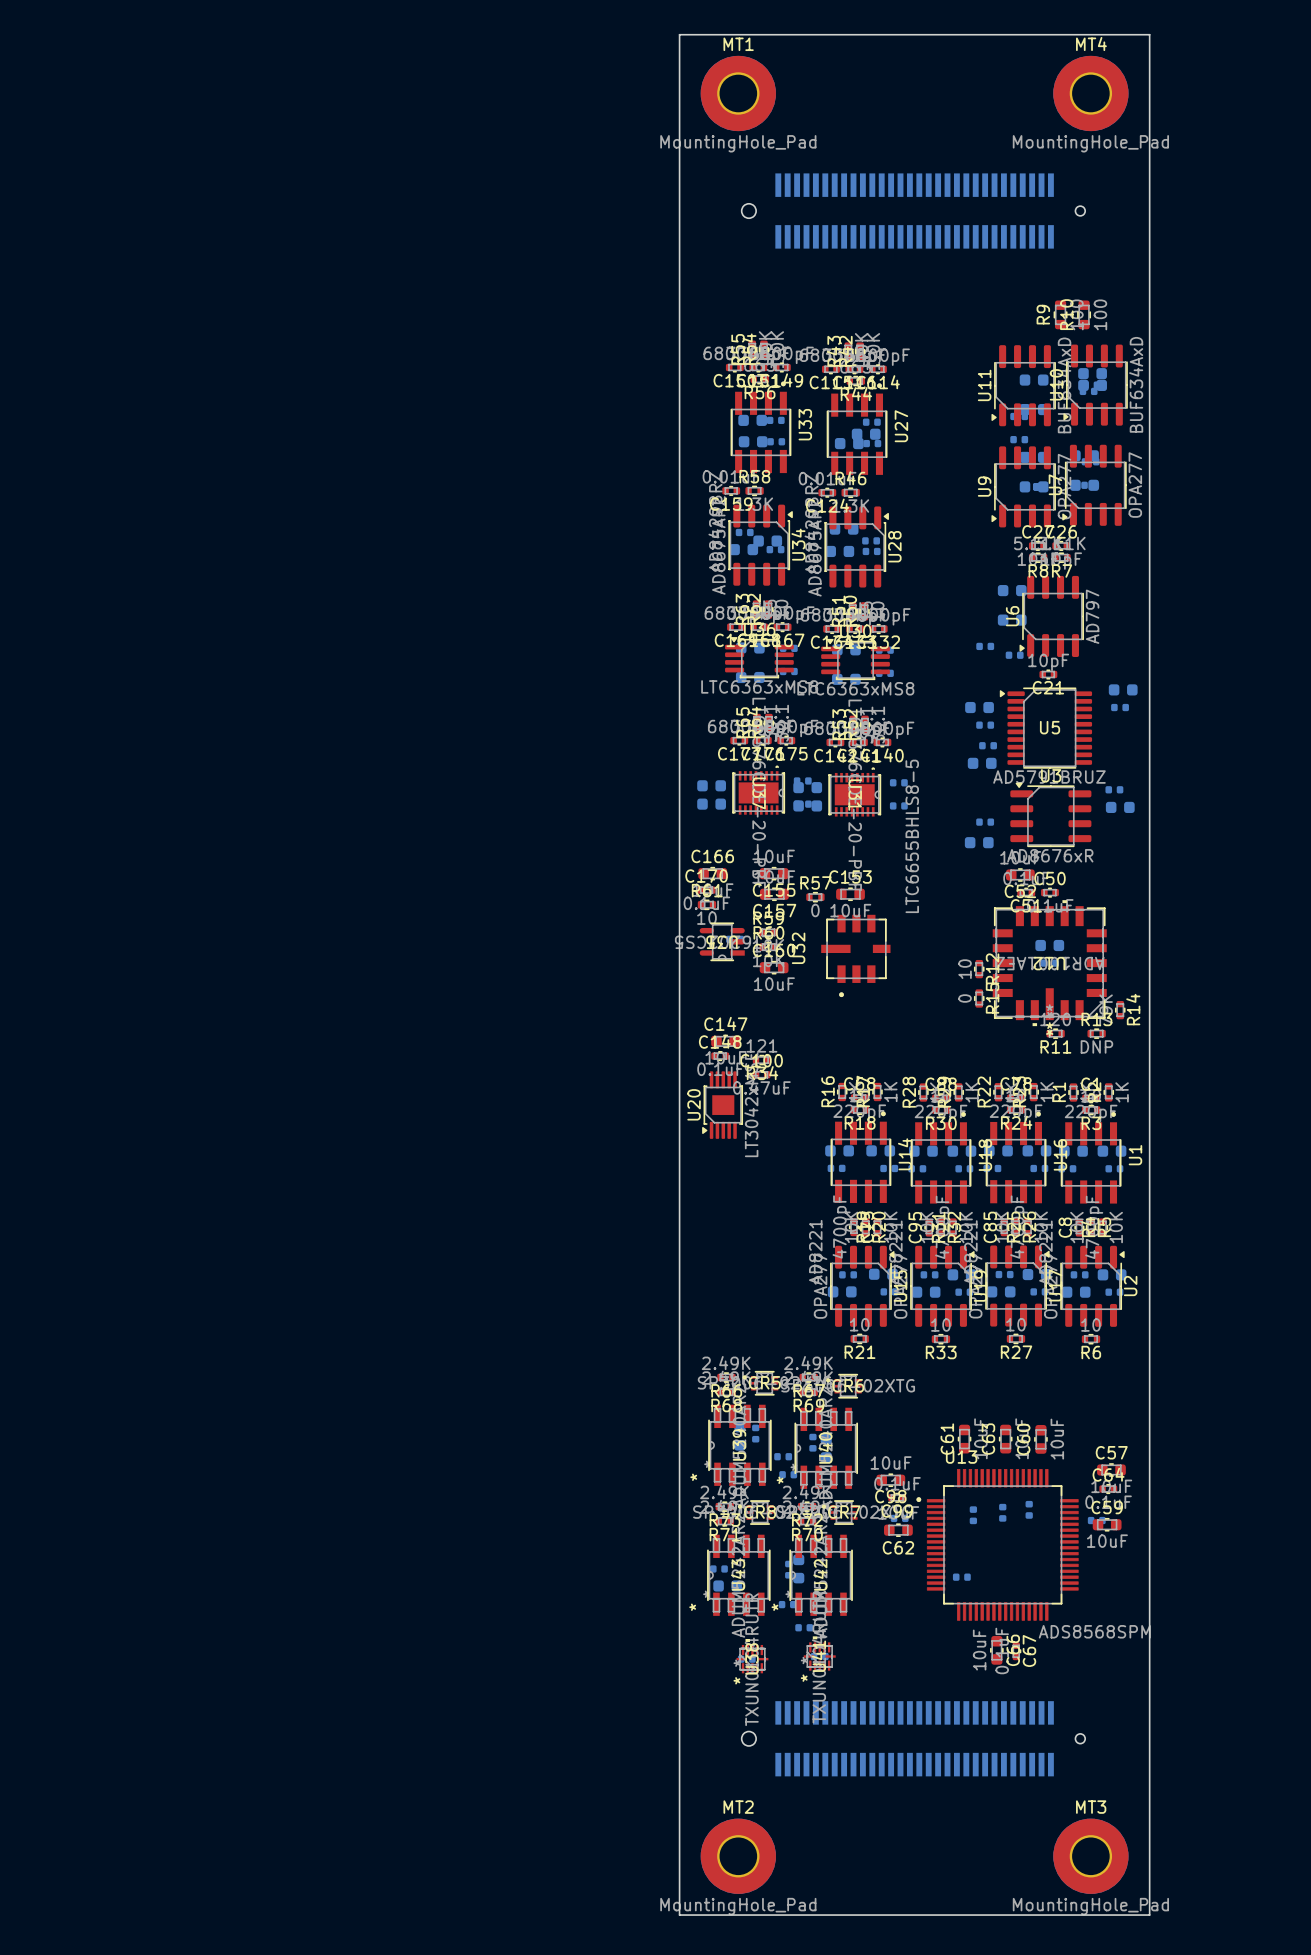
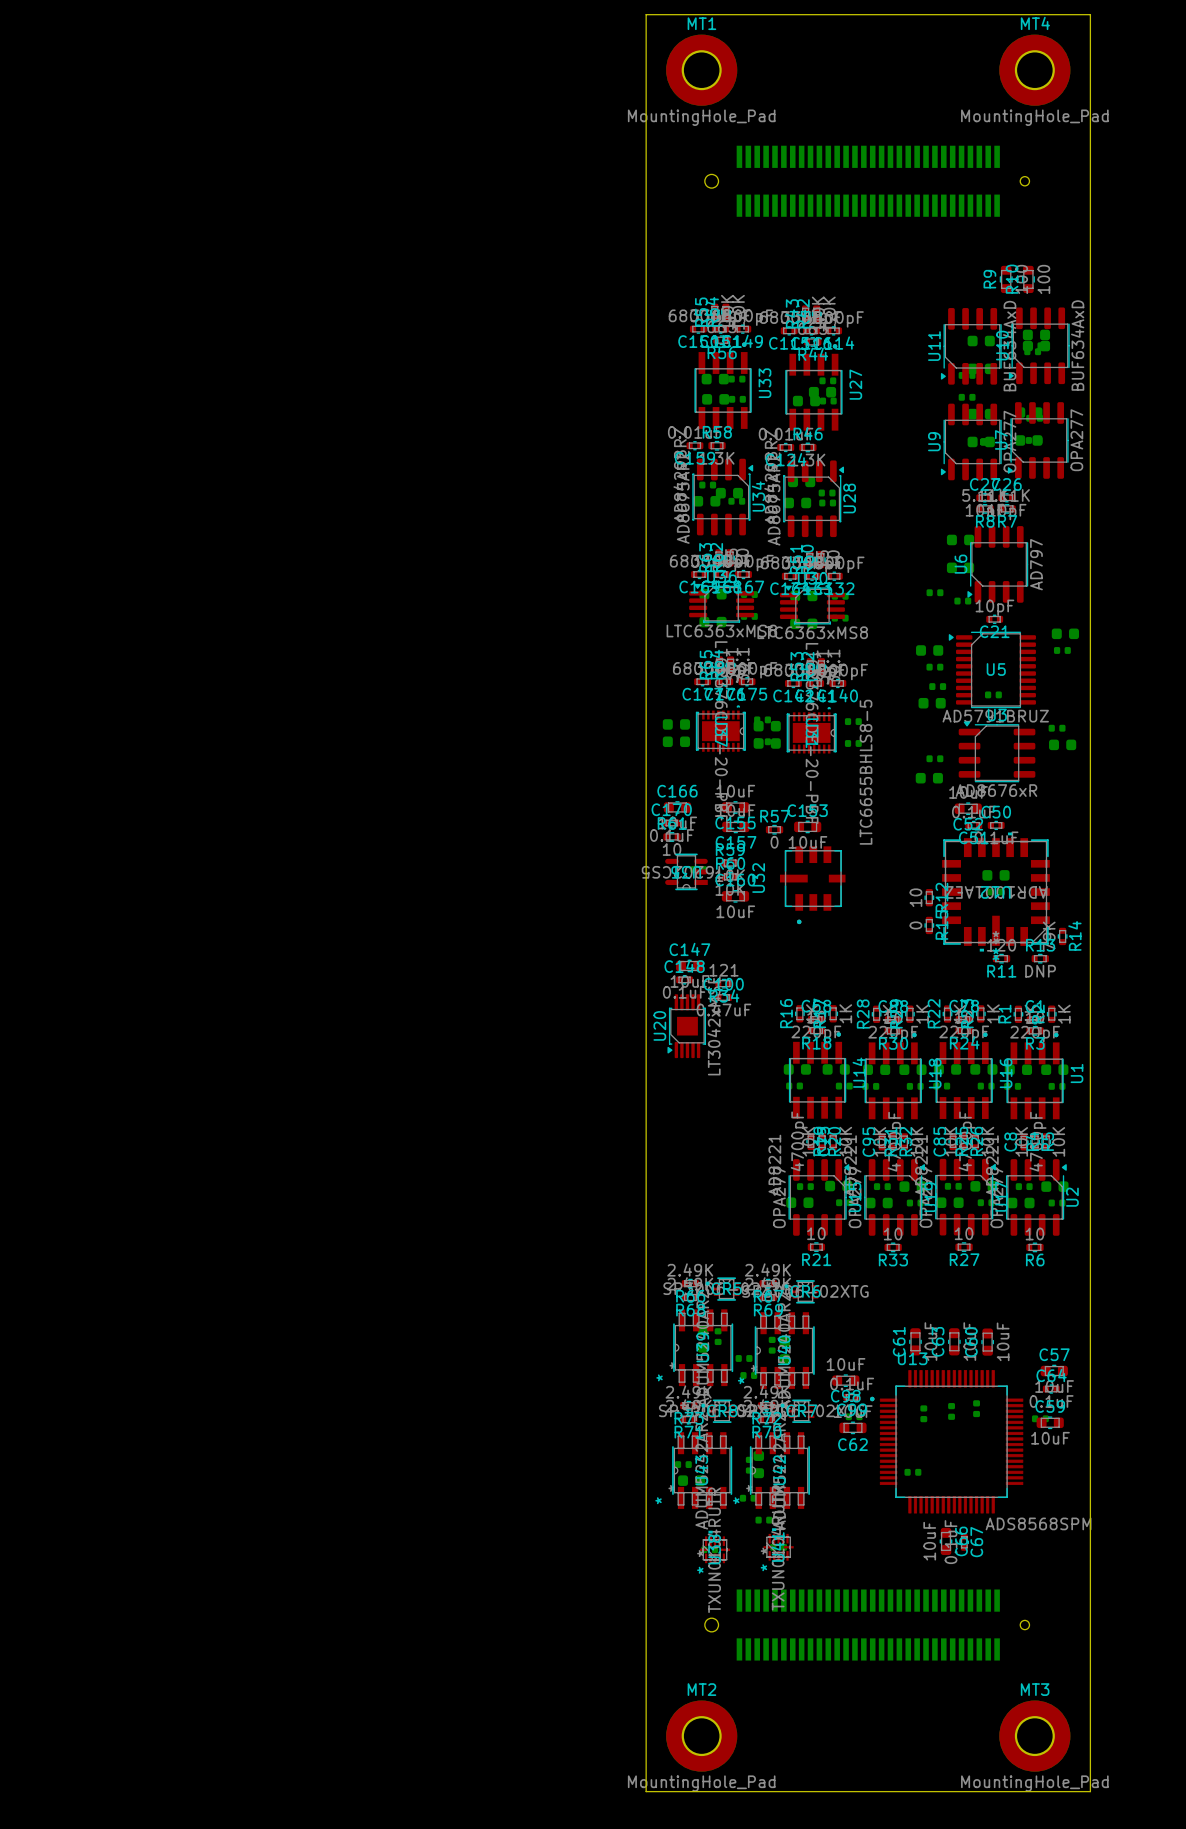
part: none -> (993, 694)

